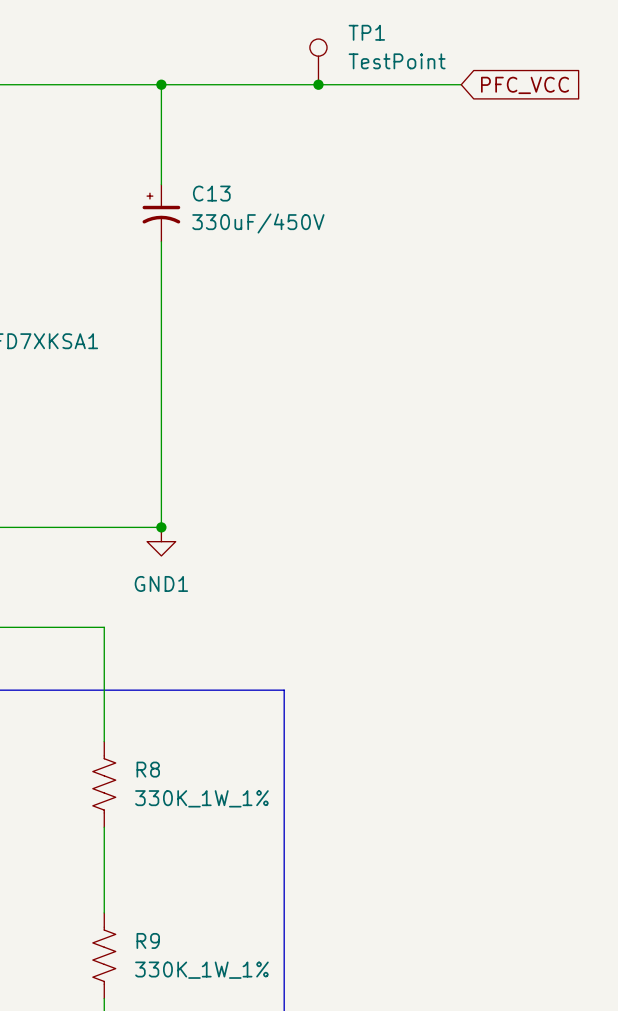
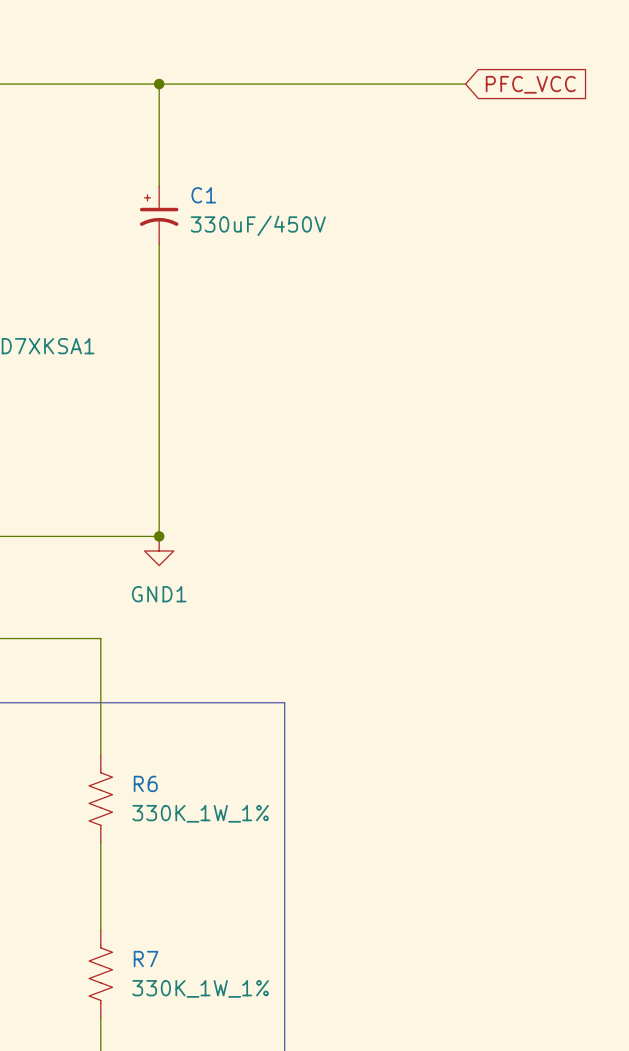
TP1: TestPoint (318, 61) -> none
junction: (318, 84) -> none
C13 name: C13 (211, 193) -> C1 (203, 195)
R8 name: R8 (148, 769) -> R6 (145, 783)
R9 name: R9 (148, 940) -> R7 (146, 959)

